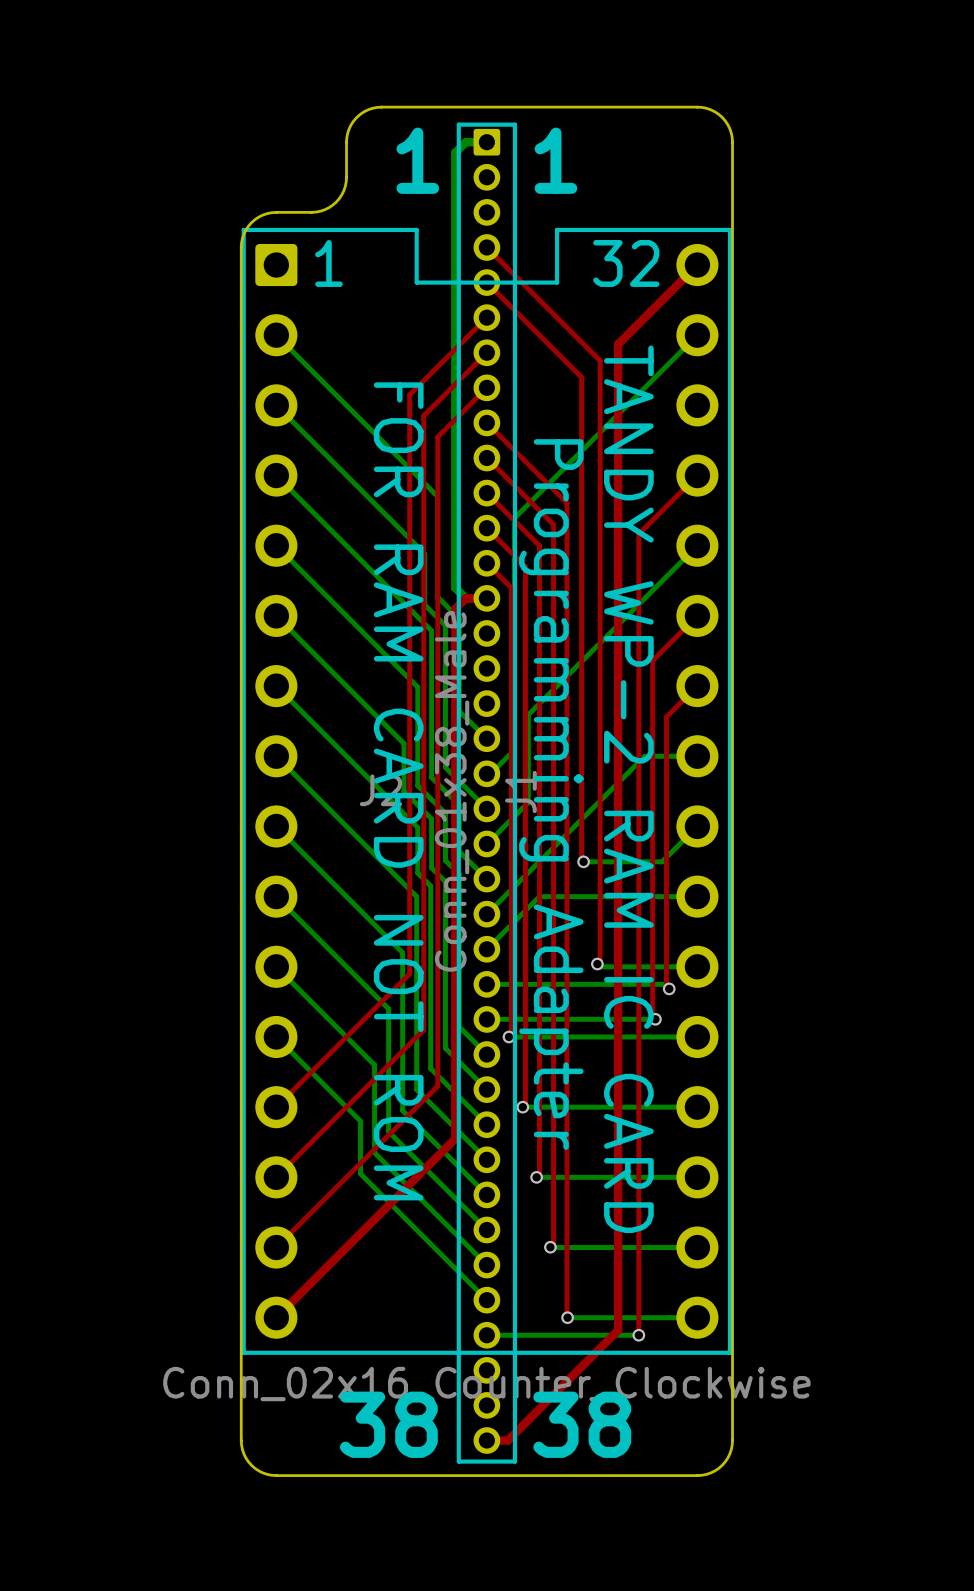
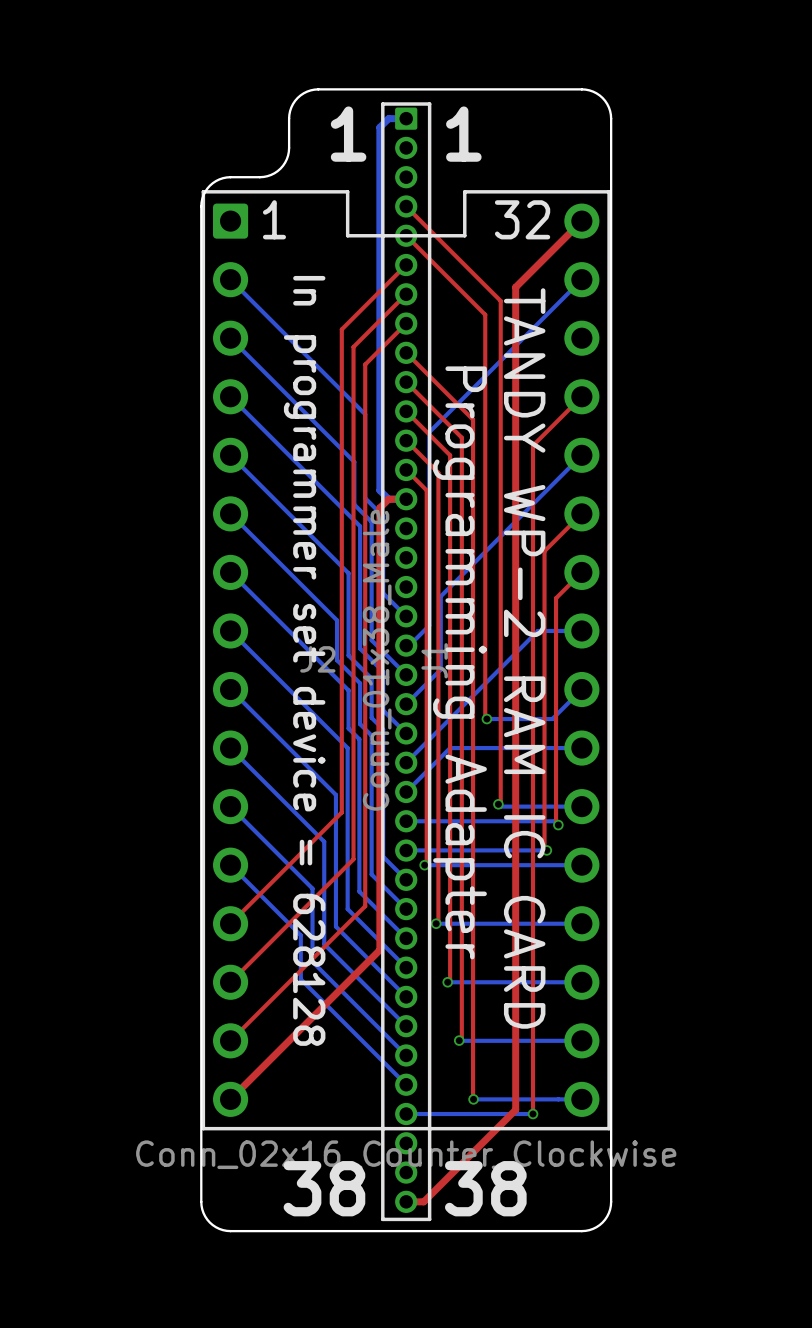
text: FOR RAM CARD NOT ROM (398, 791) -> In programmer set device = 628128 (304, 660)

